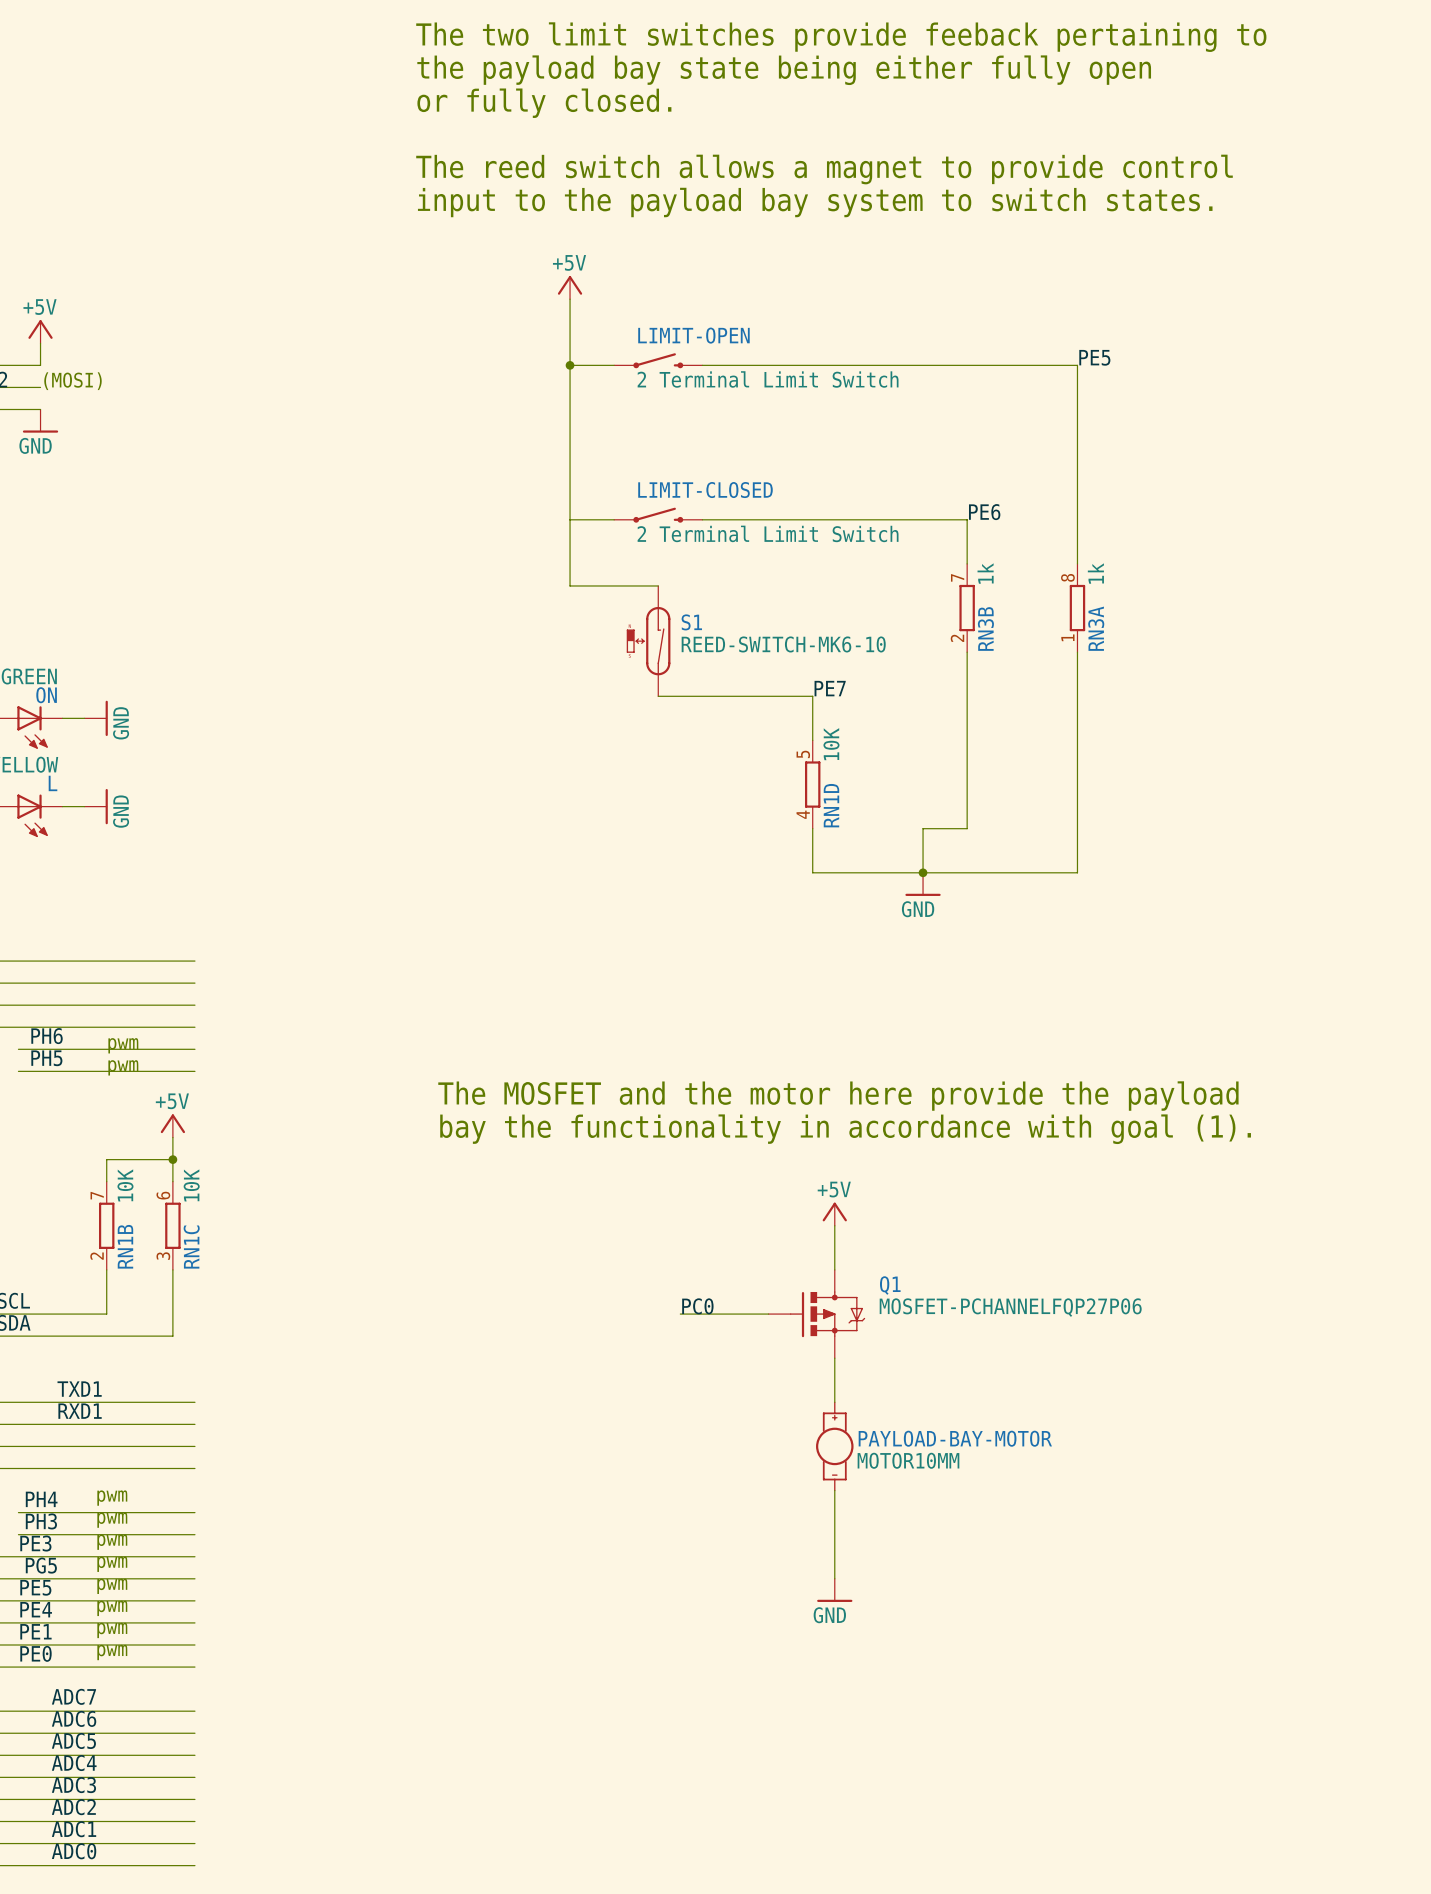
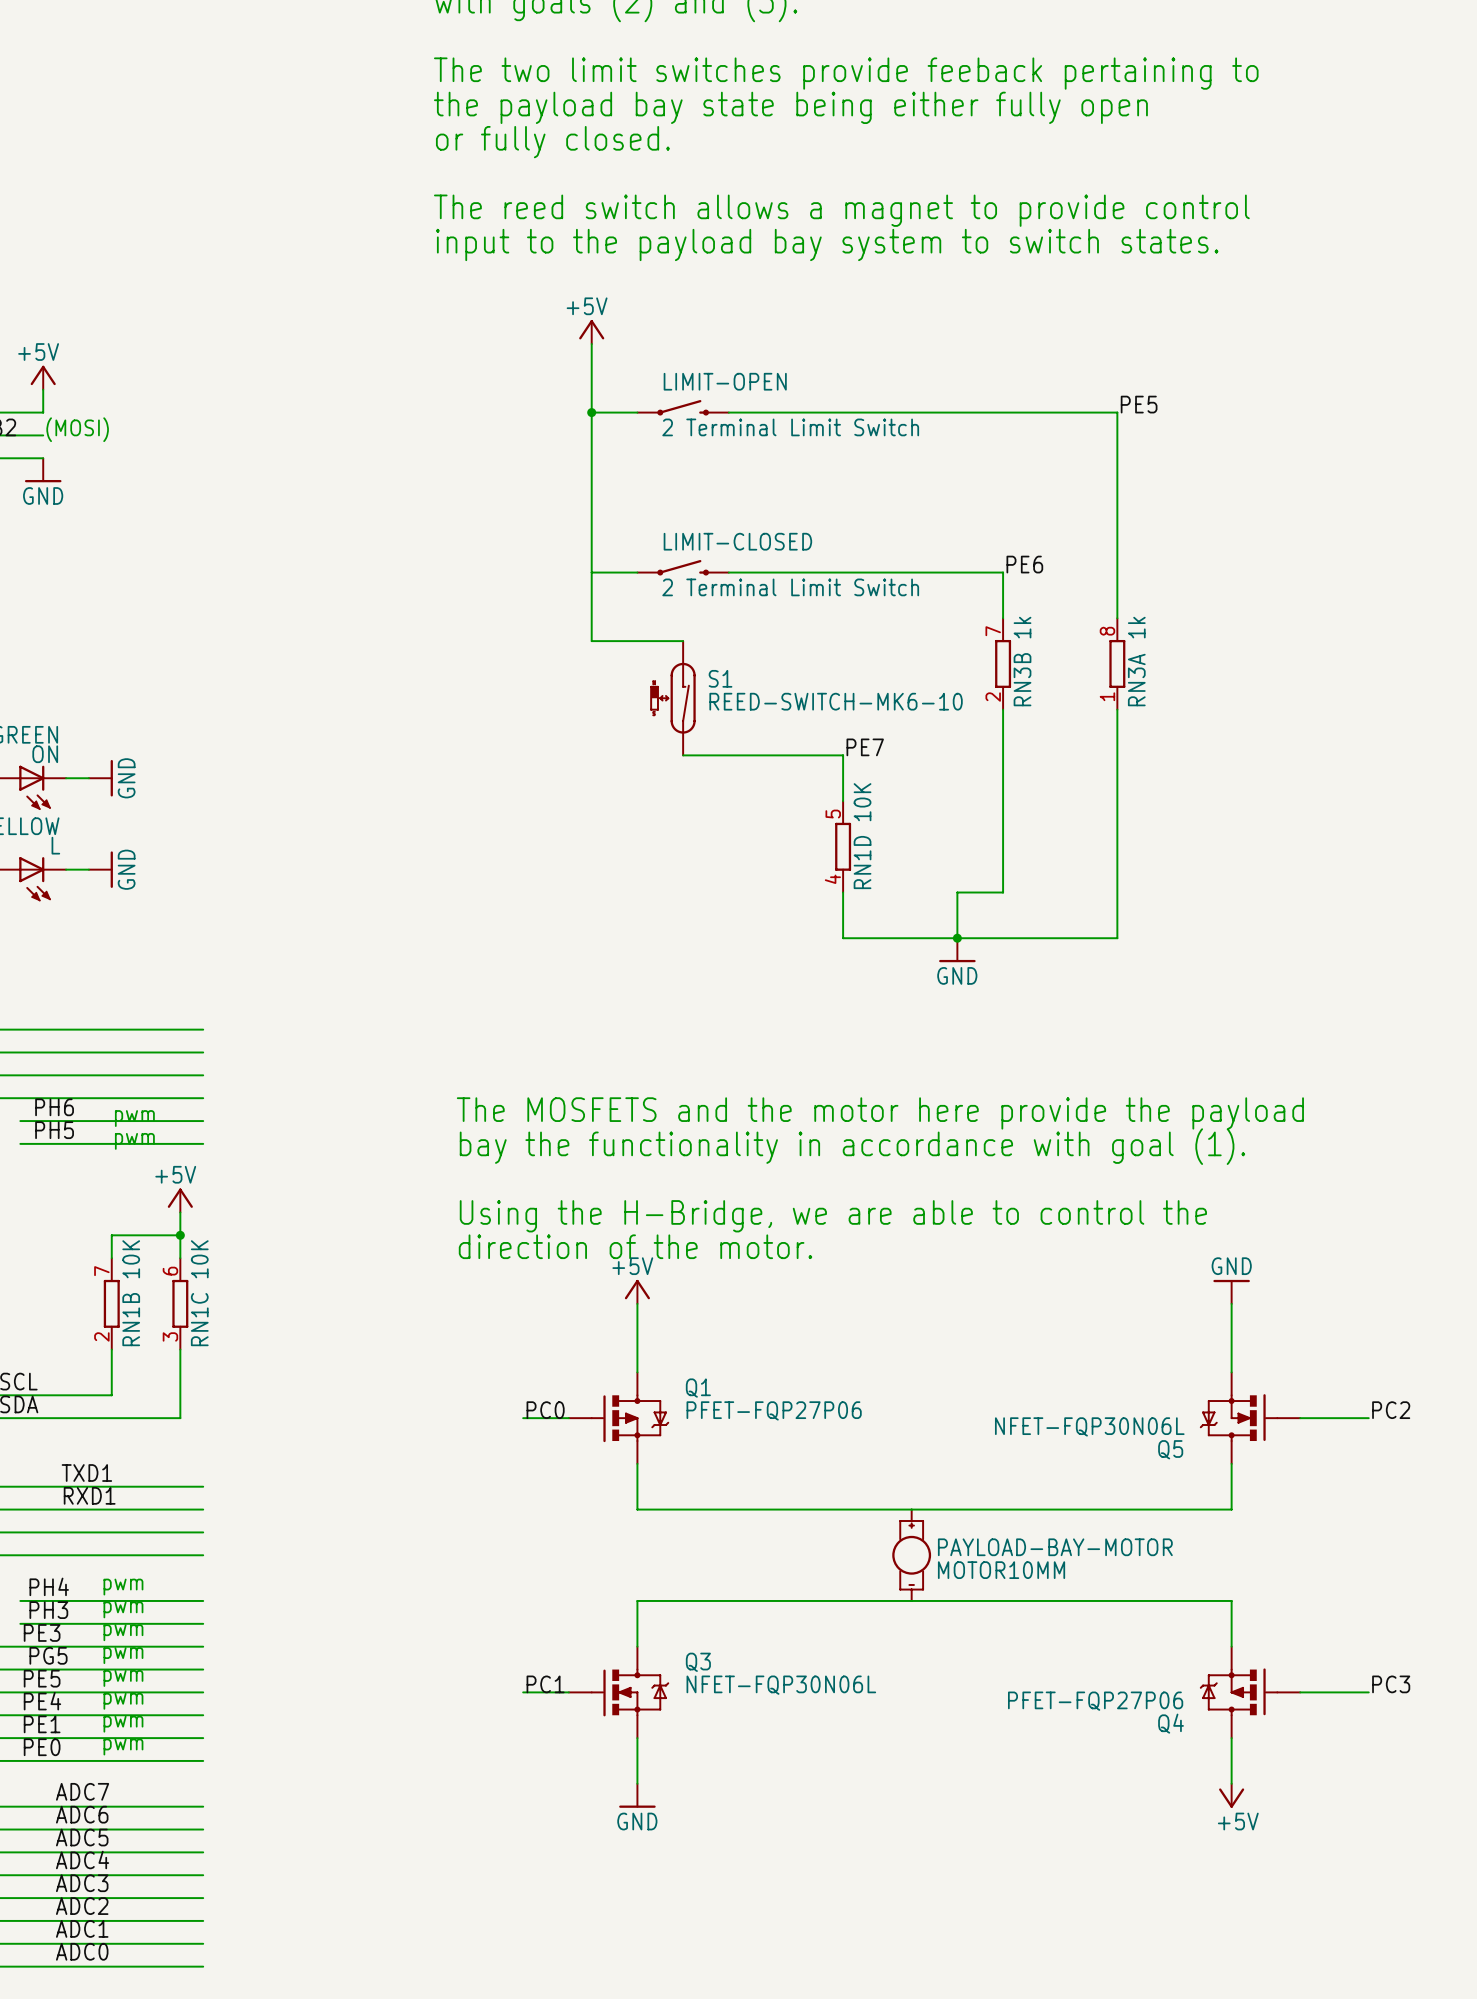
text: none -> The MOSFETS and the motor here provide the payload (880, 1113)
text: The MOSFET and the motor here provide the payload (838, 1096) -> none
text position: bay the functionality in accordance with goal (1). (845, 1129) -> bay the functionality in accordance with goal (1). (852, 1146)
text: none -> Using the H-Bridge, we are able to control the (833, 1216)
text: none -> direction of the motor. (635, 1246)
power symbol: none -> +5V (637, 1291)
power symbol: +5V (834, 1214) -> none
power symbol: none -> GND (1231, 1291)
wire: none -> (637, 1303) (637, 1372)
wire: (834, 1225) (834, 1269) -> none
wire: none -> (1231, 1303) (1231, 1372)
label position: PC0 (697, 1306) -> PC0 (545, 1410)
Q1 value: MOSFET-PCHANNELFQP27P06 (1010, 1307) -> PFET-FQP27P06 (774, 1410)
wire: (680, 1314) (768, 1314) -> none
Q1 position: (816, 1314) -> (618, 1418)
label: none -> PC2 (1391, 1410)
wire: none -> (523, 1418) (568, 1418)
Q5: none -> NFET-FQP30N06L (1250, 1418)
wire: none -> (1300, 1418) (1368, 1418)
wire: (834, 1358) (834, 1402) -> none
wire: none -> (637, 1463) (637, 1509) (1231, 1509) (1231, 1463)
PAYLOAD-BAY-MOTOR position: (834, 1446) -> (911, 1555)
wire: (834, 1490) (834, 1578) -> none
wire: none -> (637, 1646) (637, 1600) (1231, 1600) (1231, 1646)
power symbol: GND (834, 1590) -> none
label: none -> PC1 (545, 1684)
label: none -> PC3 (1391, 1684)
wire: none -> (523, 1692) (568, 1692)
Q3: none -> NFET-FQP30N06L (618, 1692)
Q4: none -> PFET-FQP27P06 (1250, 1692)
wire: none -> (1300, 1692) (1368, 1692)
wire: none -> (637, 1738) (637, 1783)
wire: none -> (1231, 1738) (1231, 1783)
power symbol: none -> GND (637, 1795)
power symbol: none -> +5V (1231, 1795)

